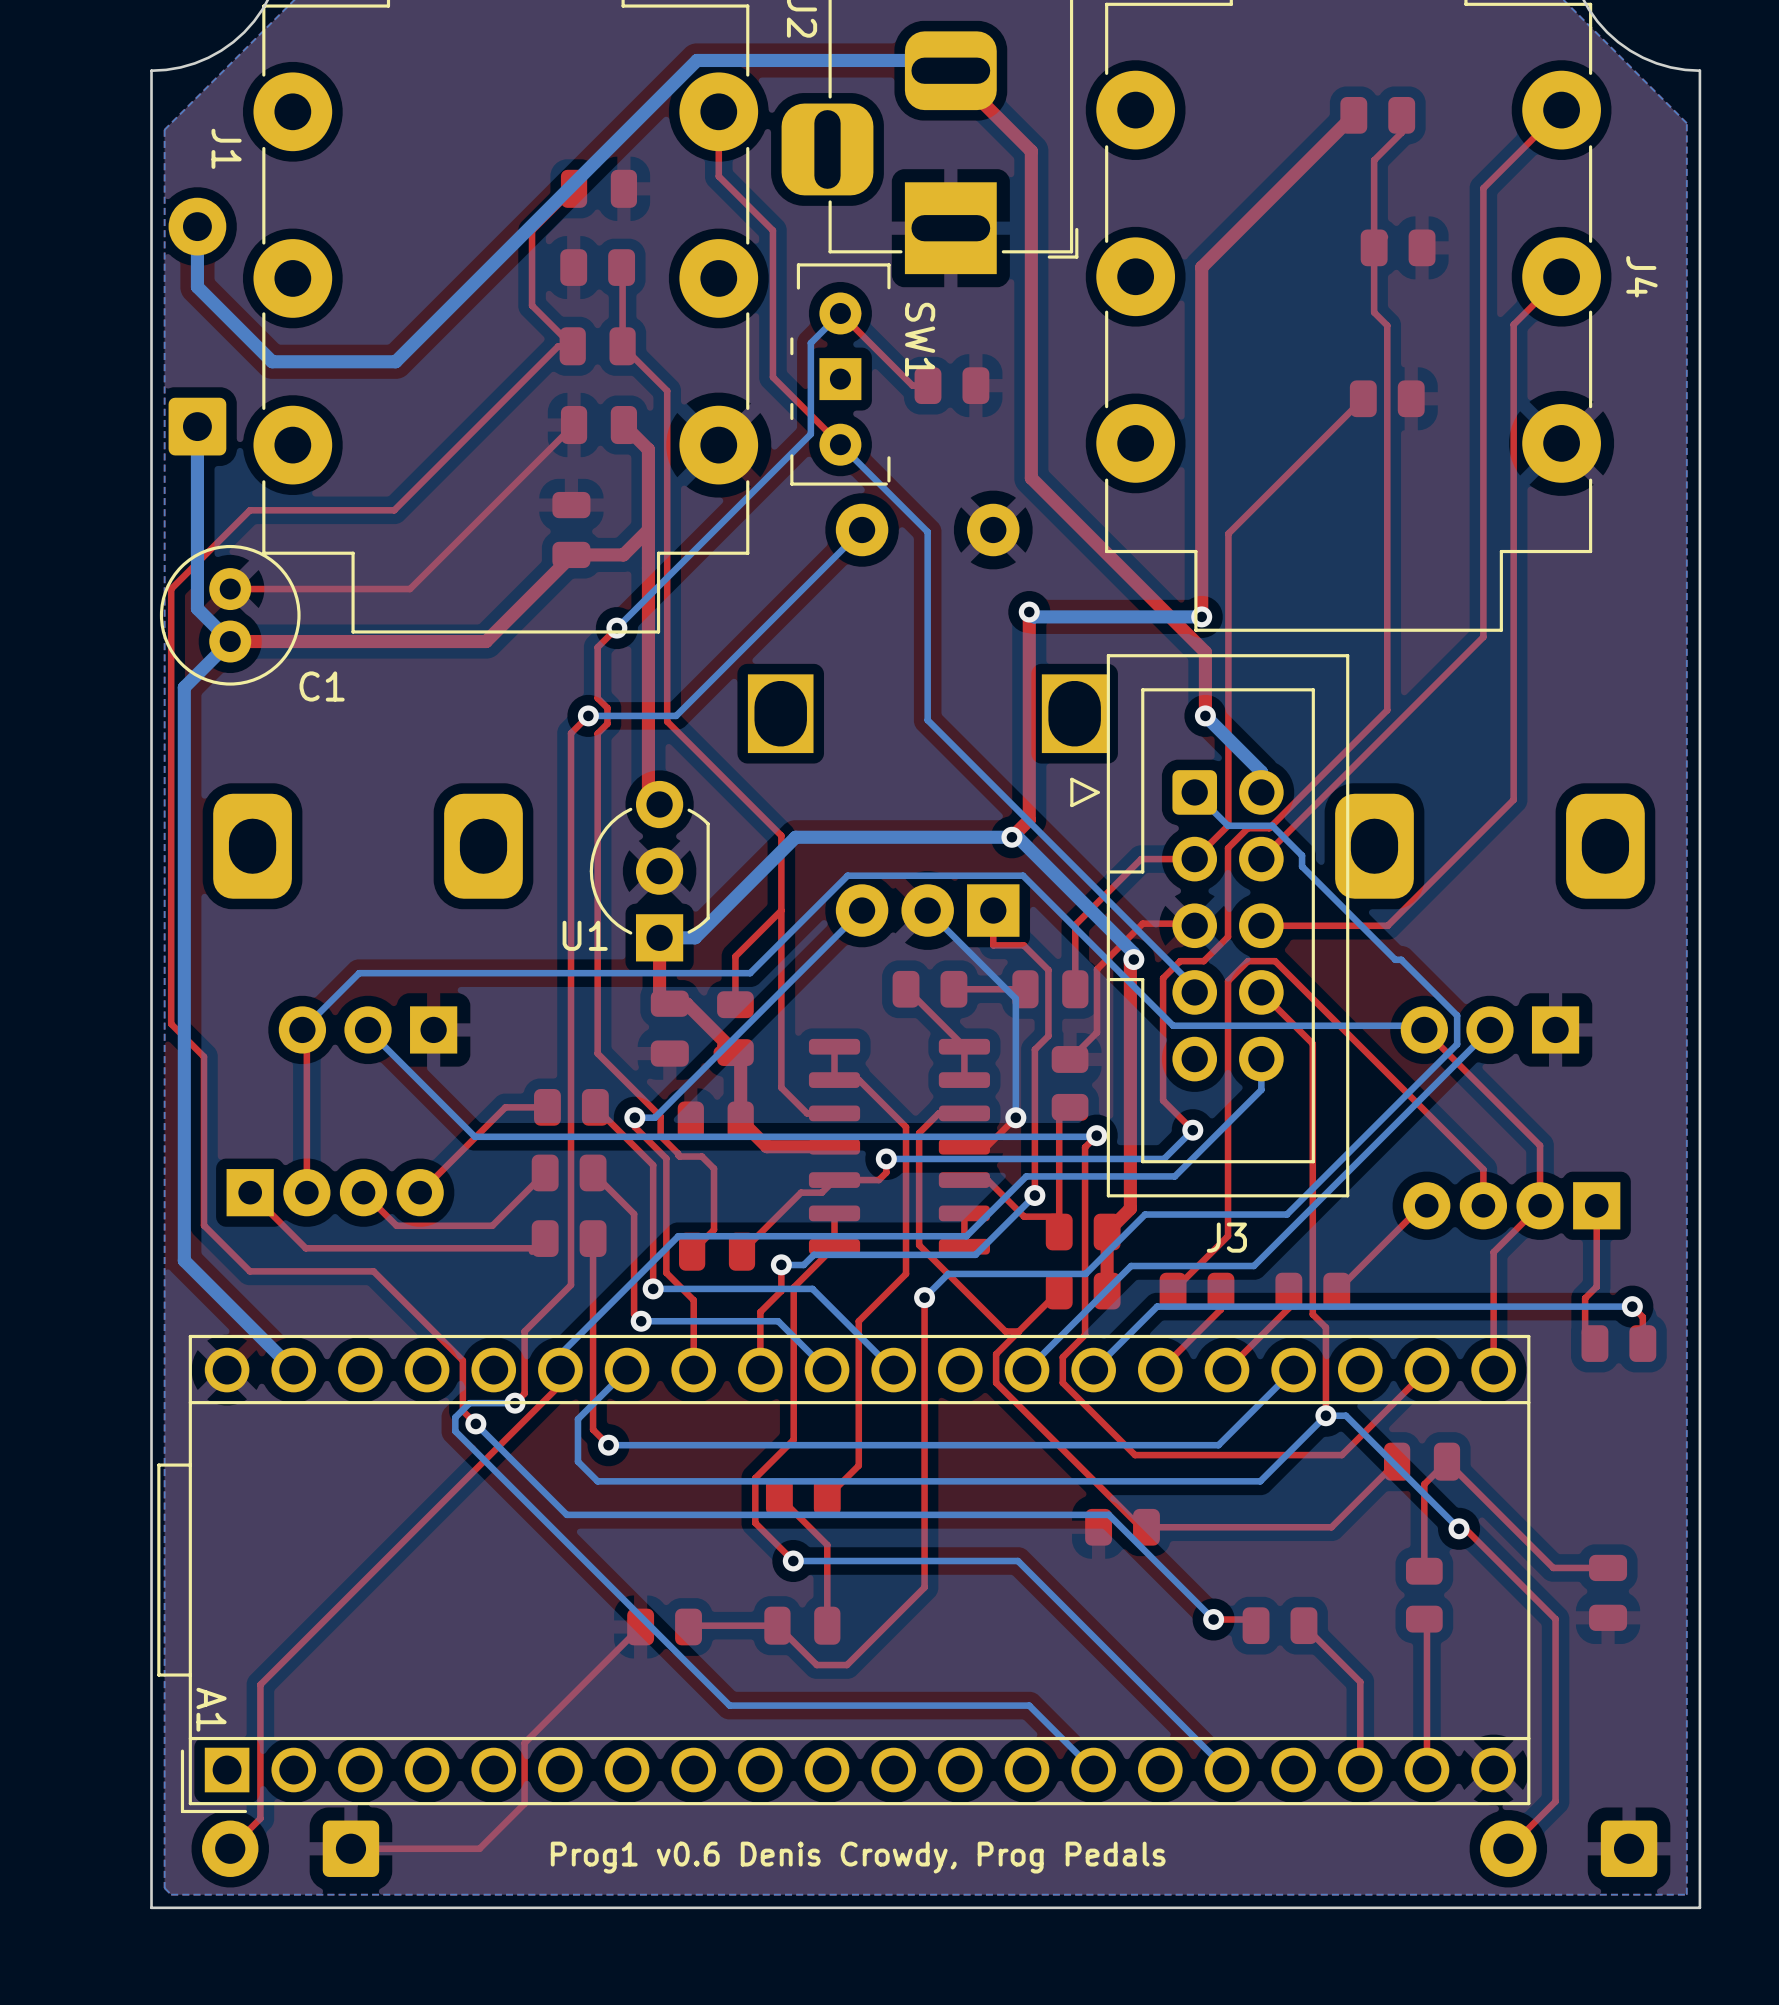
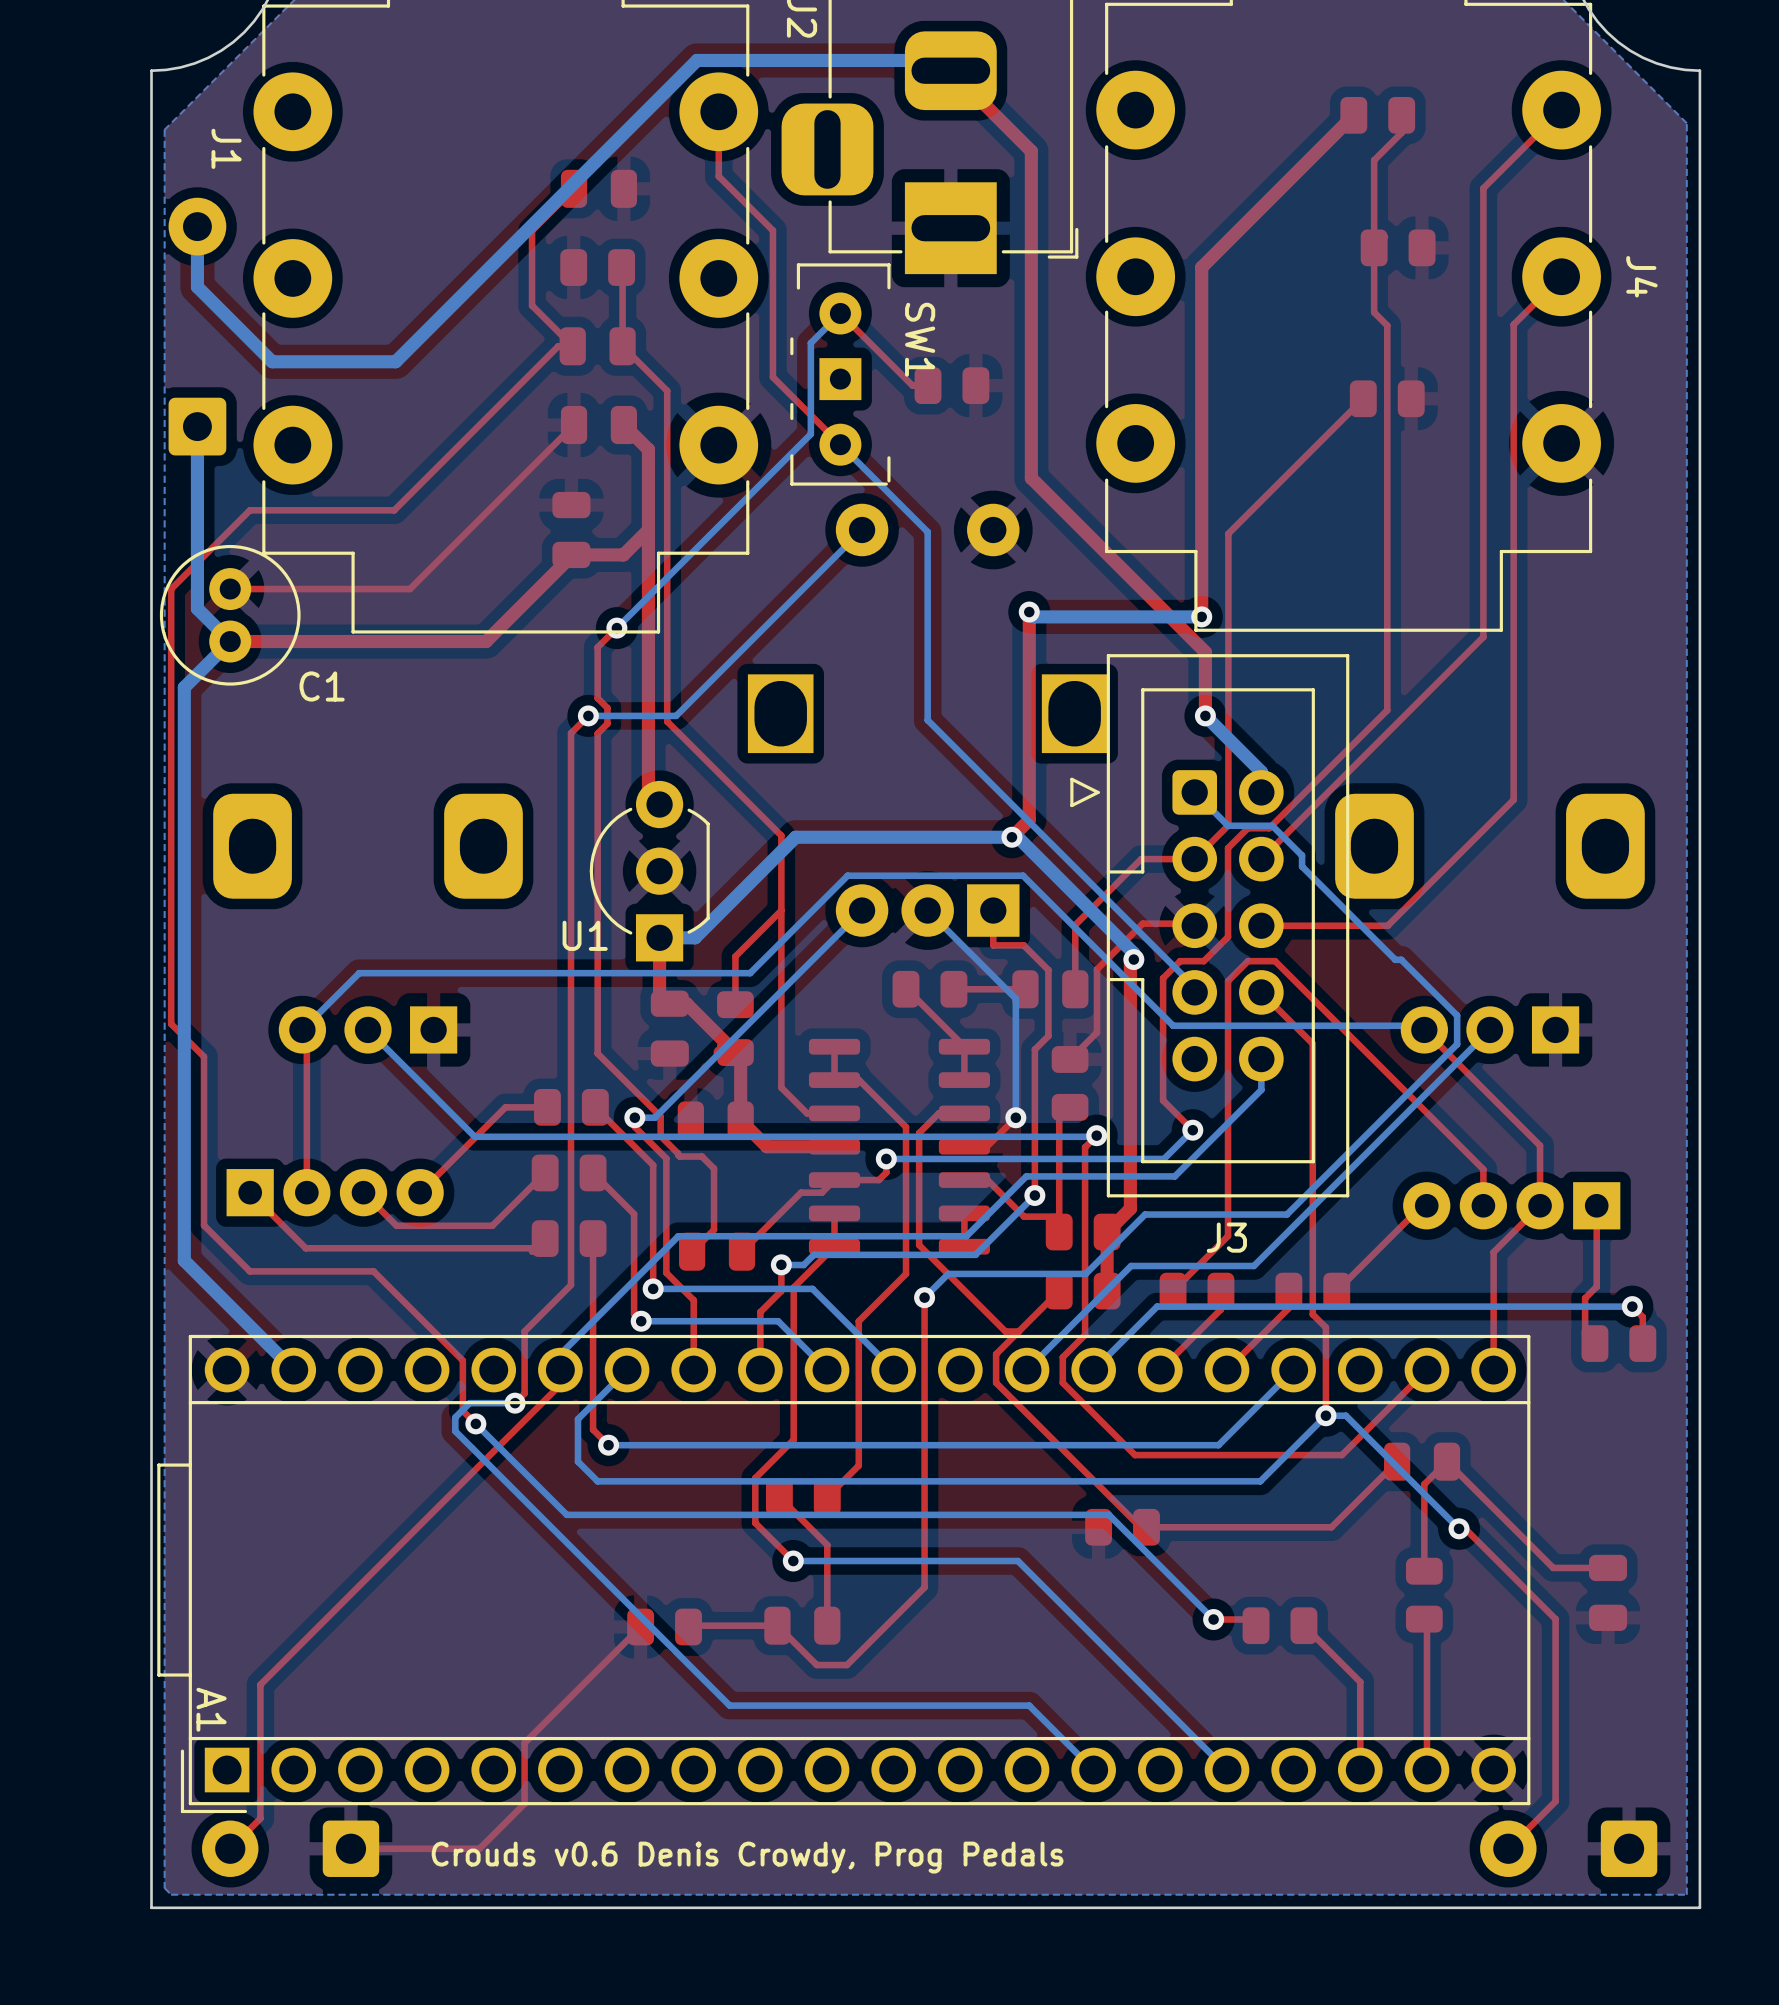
text: Prog1 v0.6 Denis Crowdy, Prog Pedals (858, 1857) -> Crouds v0.6 Denis Crowdy, Prog Pedals (747, 1857)

